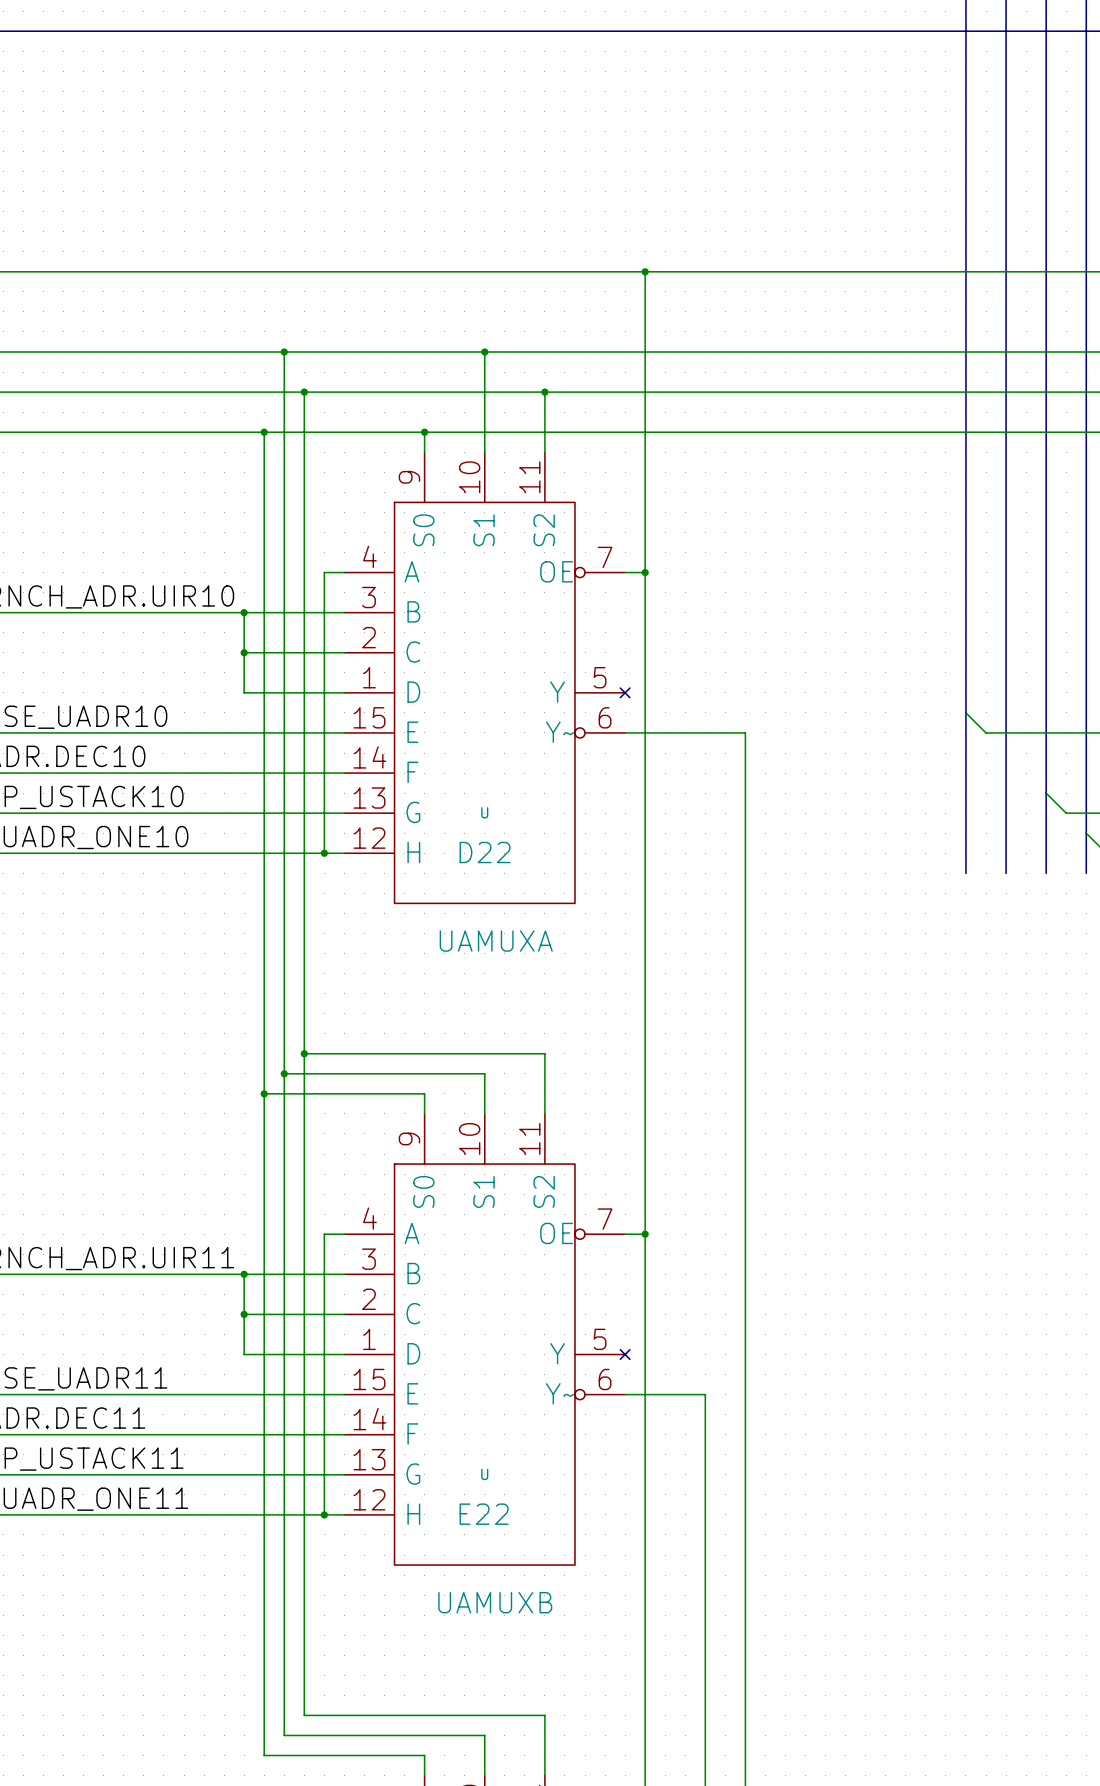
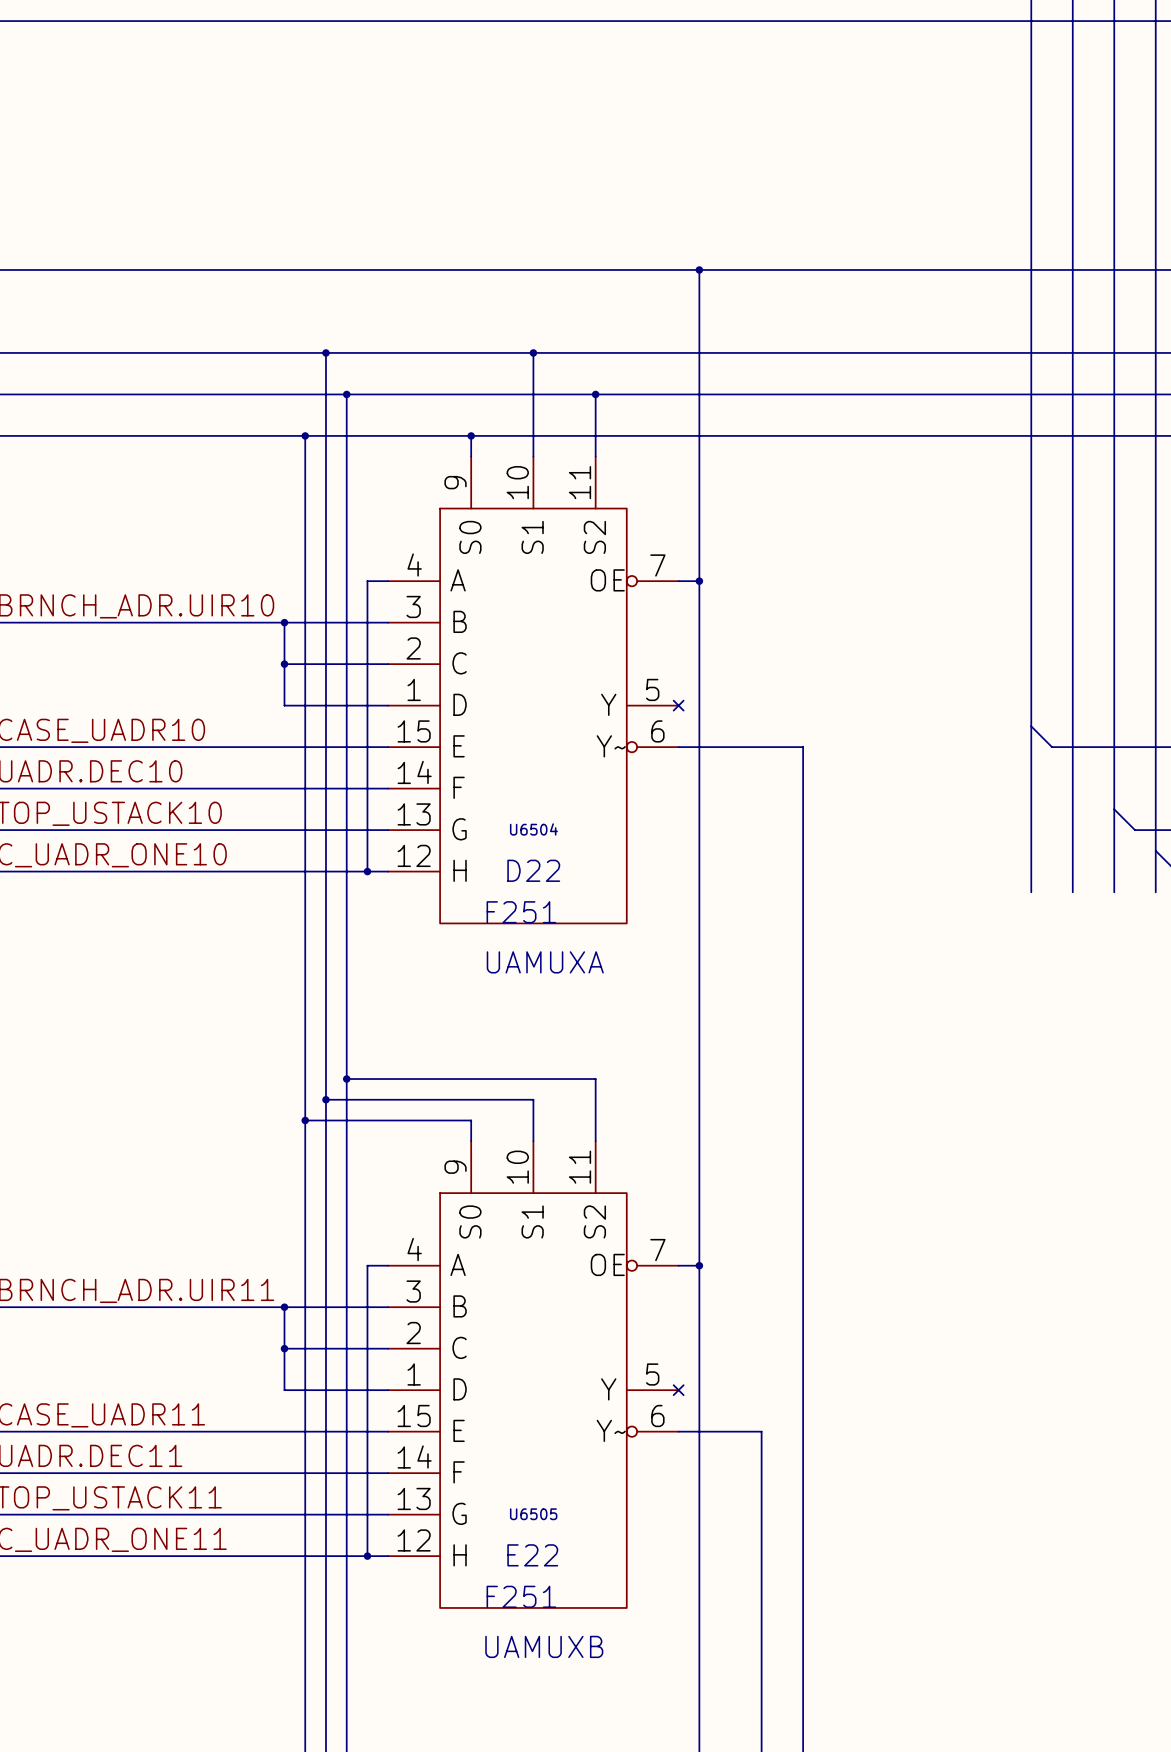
U name: U (484, 812) -> U6504 (533, 829)
U value: none -> F251 (521, 912)
U name: U (484, 1474) -> U6505 (533, 1514)
U value: none -> F251 (521, 1596)

